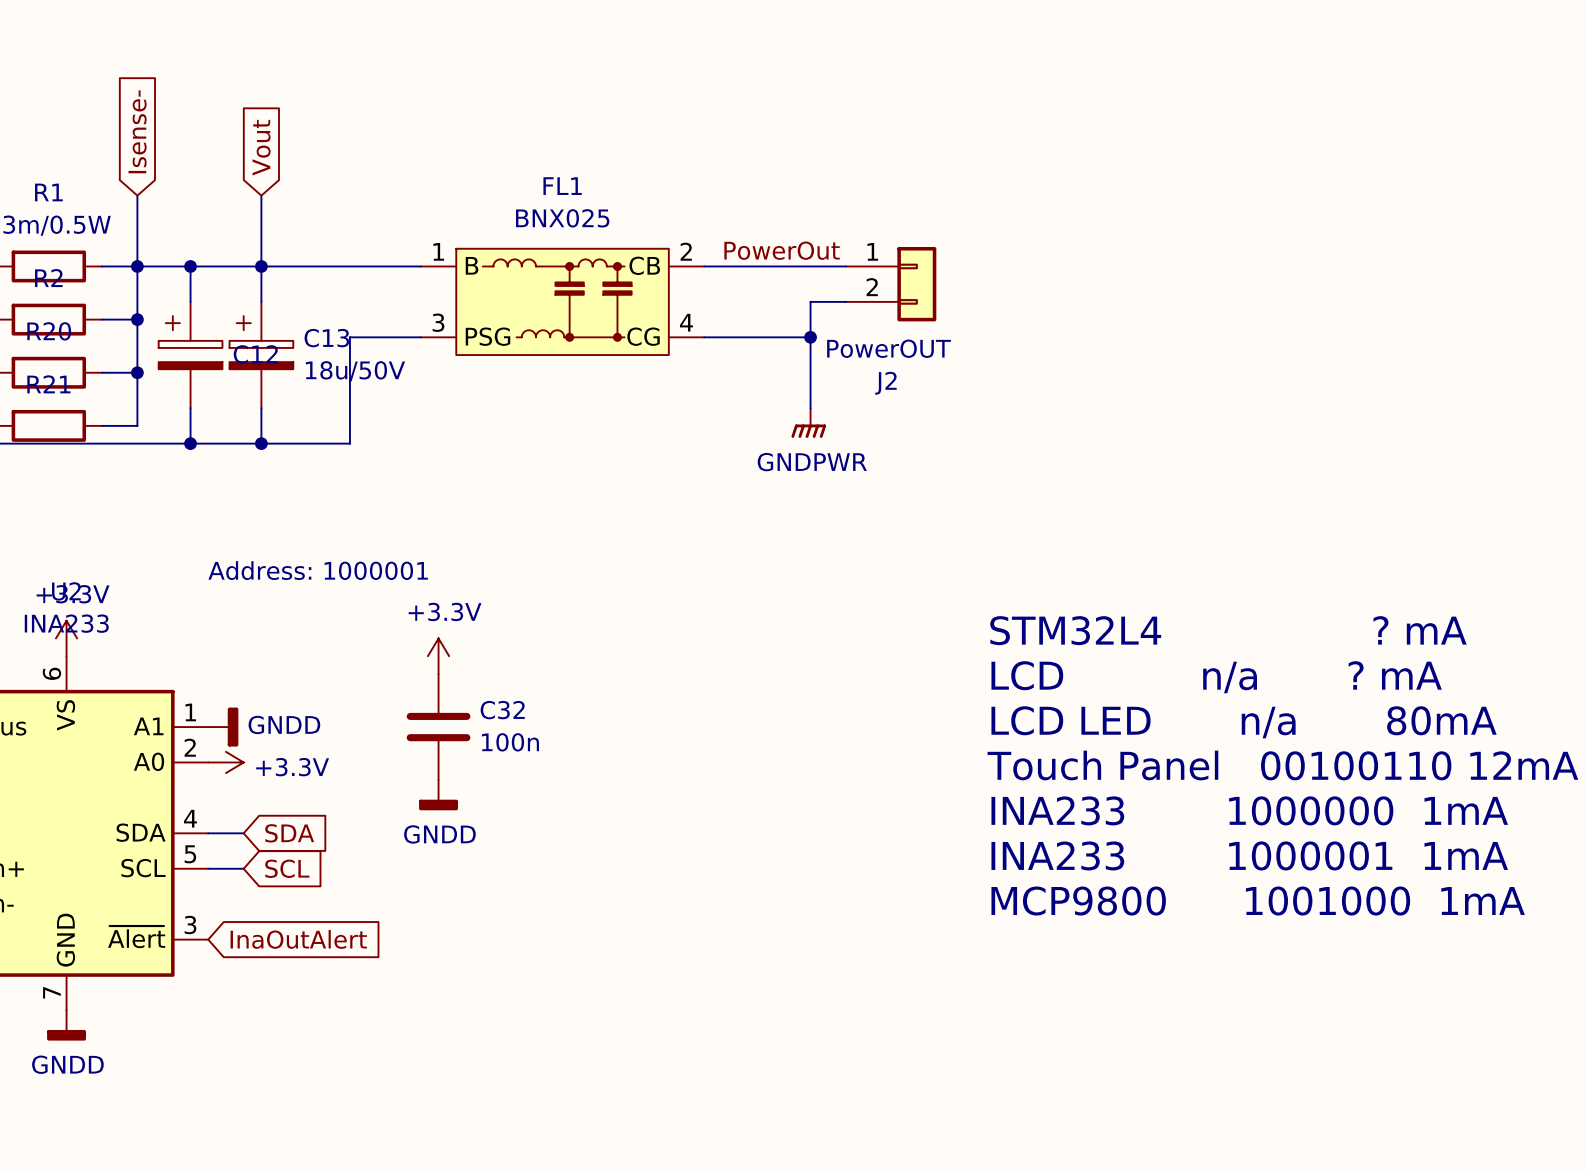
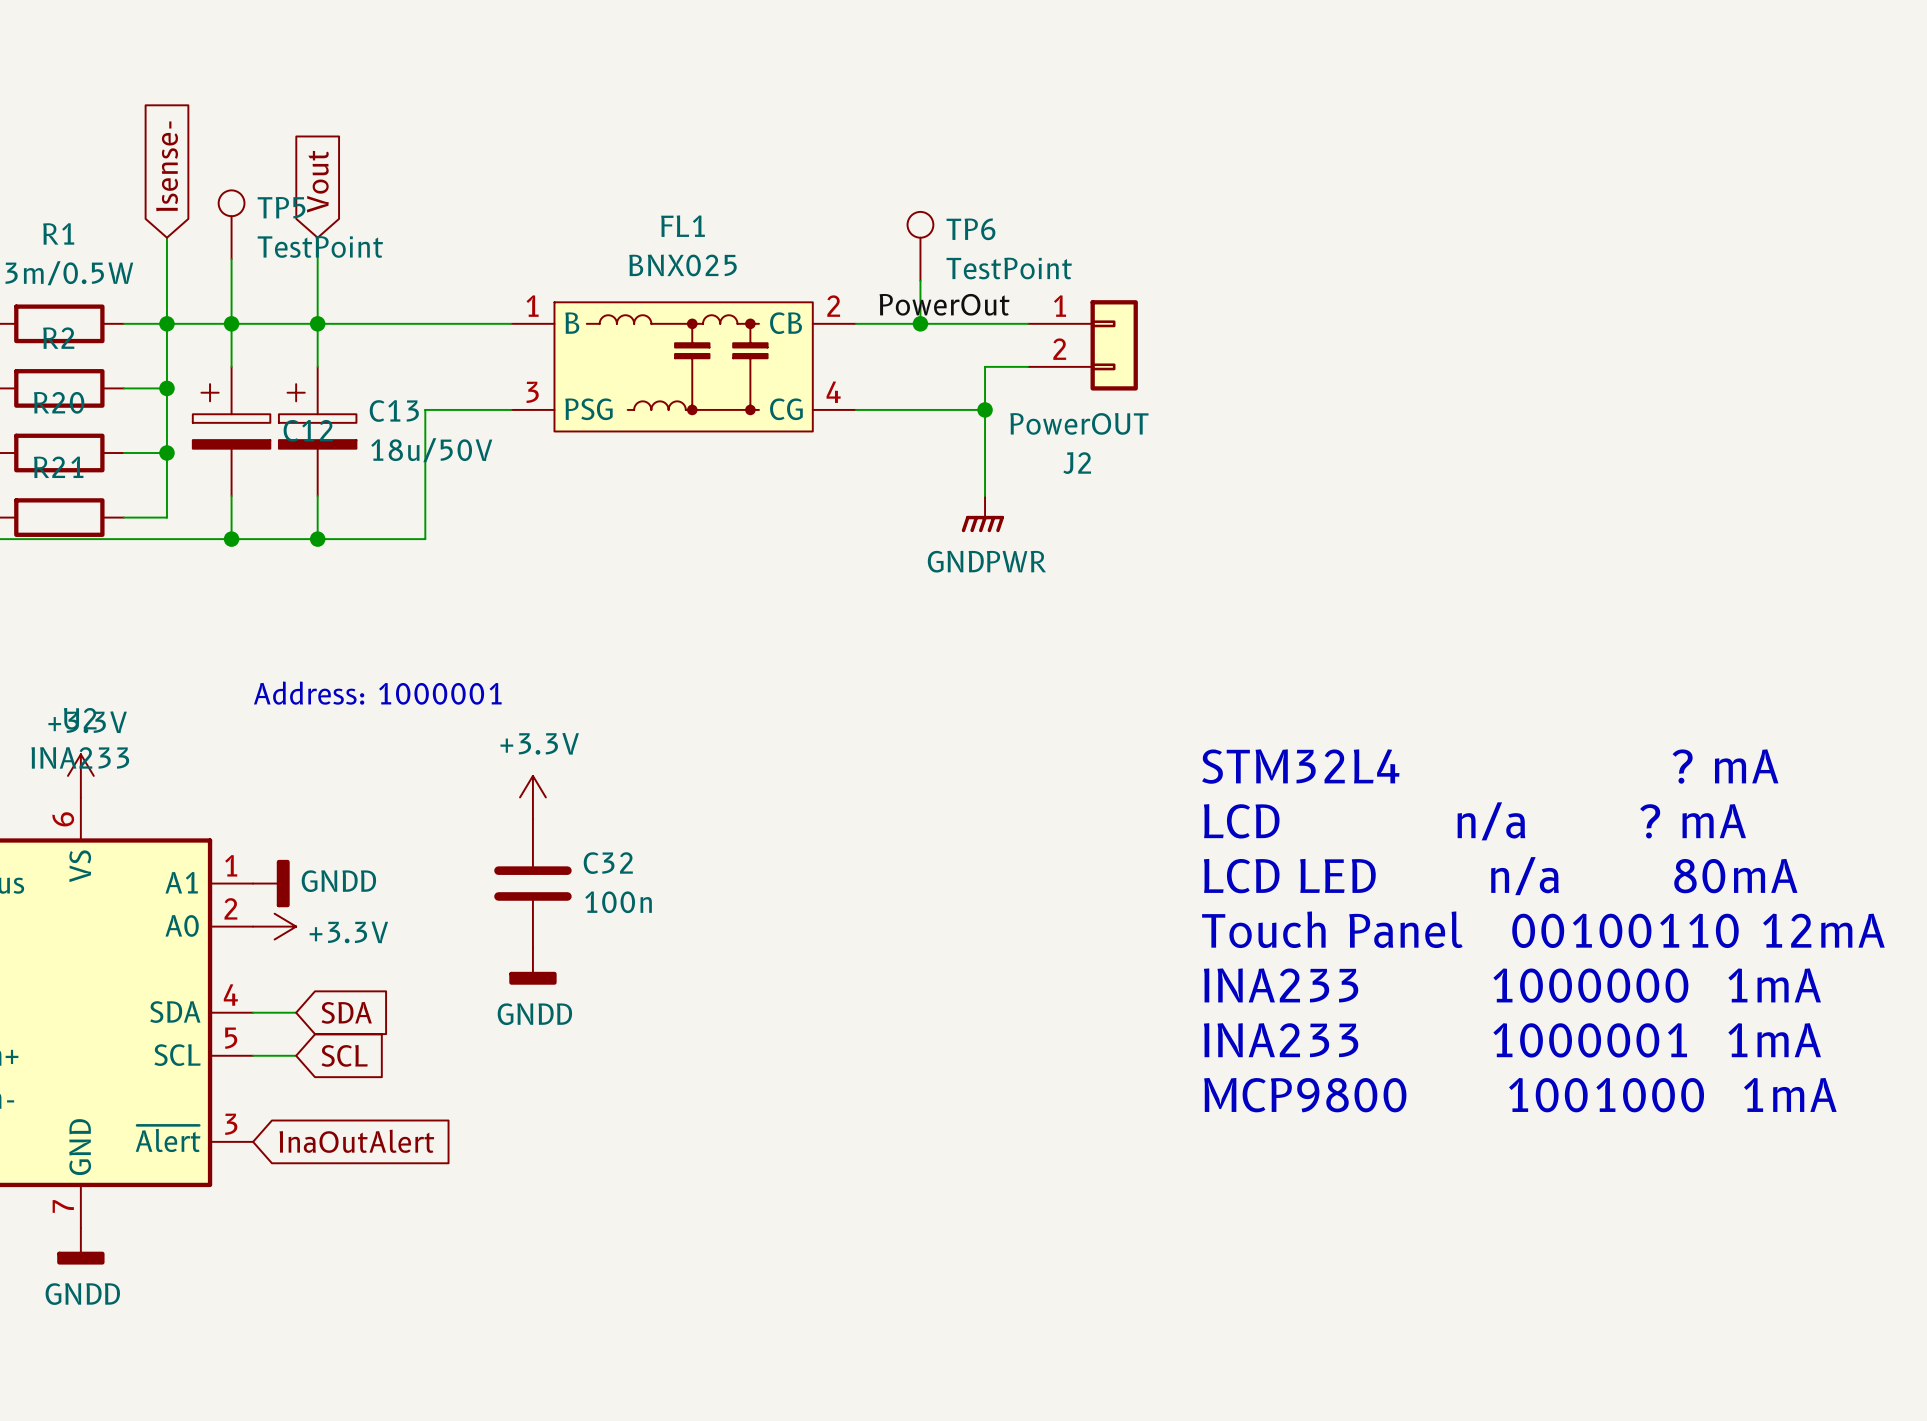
TP5: none -> TestPoint (231, 224)
TP6: none -> TestPoint (920, 246)
wire: none -> (231, 259) (231, 323)
wire: none -> (920, 280) (920, 323)
junction: none -> (920, 323)

